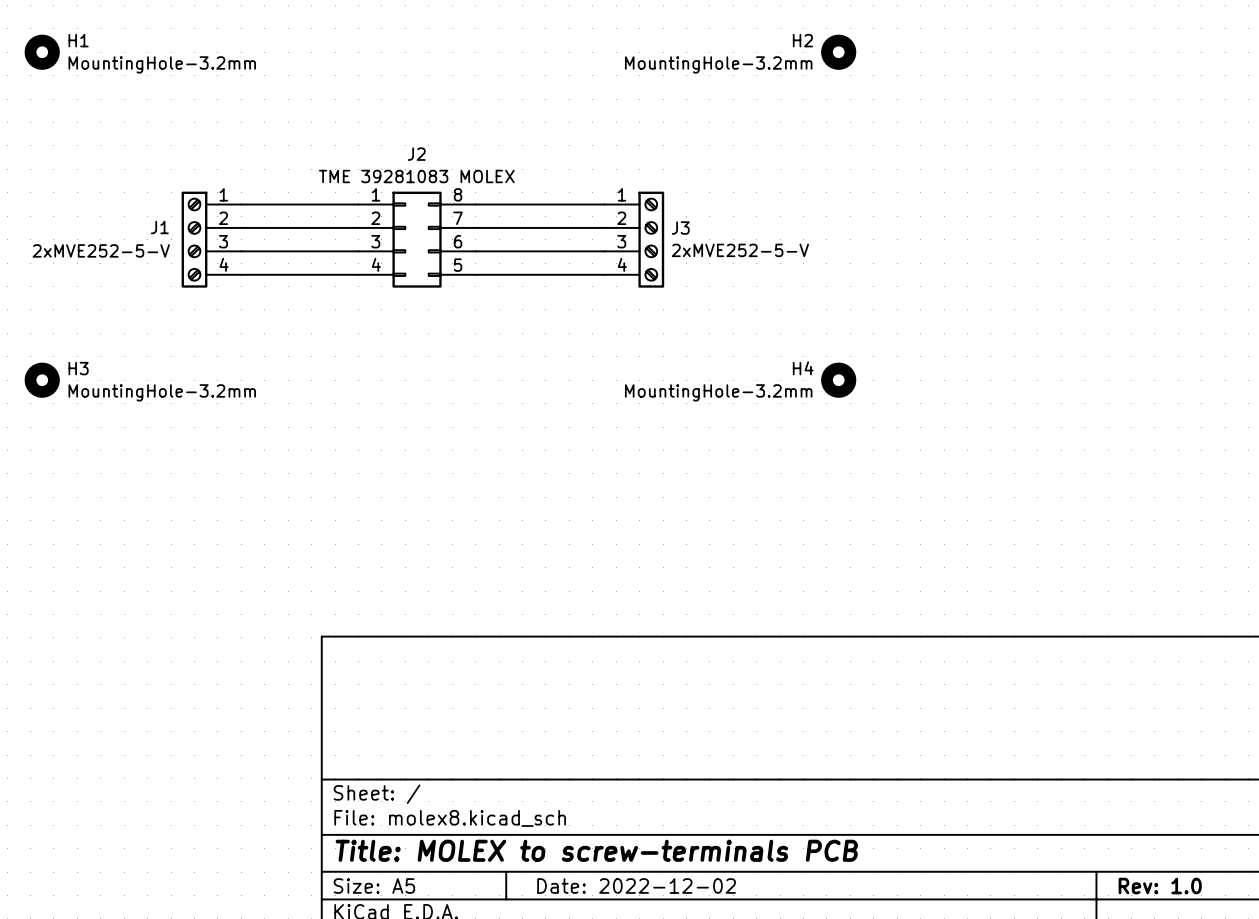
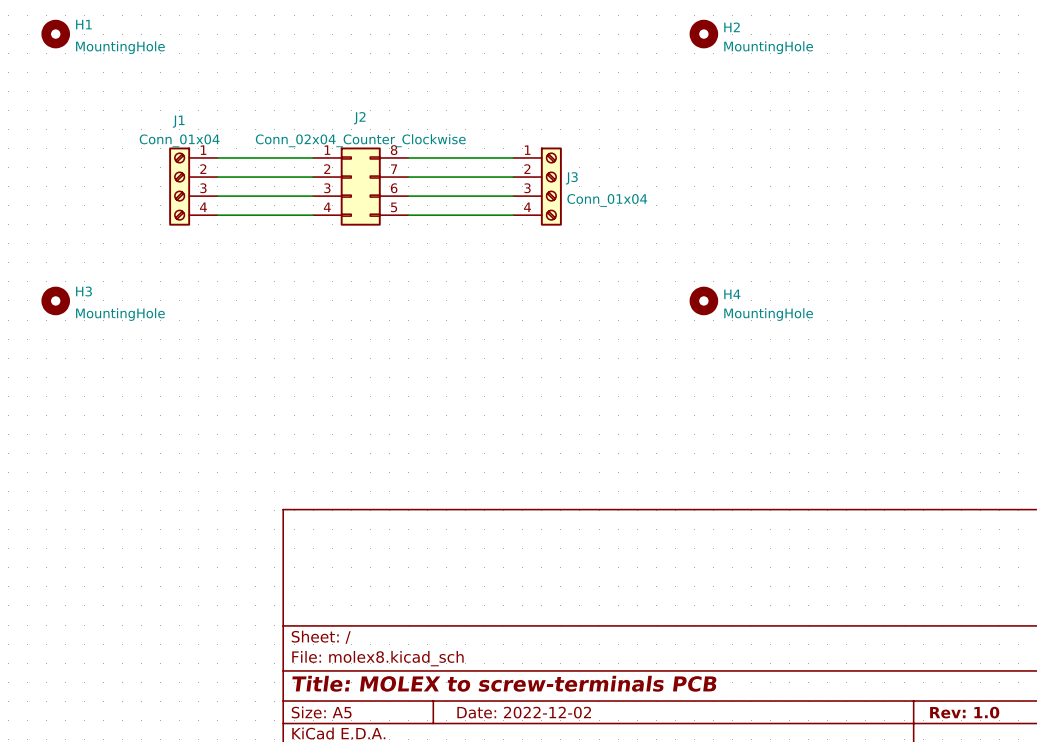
H2 name position: H2 (802, 40) -> H2 (732, 27)
H1 value: MountingHole-3.2mm (162, 64) -> MountingHole (120, 47)
H2 value: MountingHole-3.2mm (718, 64) -> MountingHole (768, 47)
J2 value: TME 39281083 MOLEX (416, 176) -> Conn_02x04_Counter_Clockwise (360, 140)
J1 name position: J1 (159, 227) -> J1 (178, 121)
J1 value: 2xMVE252-5-V (101, 250) -> Conn_01x04 (179, 140)
J3 value: 2xMVE252-5-V (740, 250) -> Conn_01x04 (607, 200)
H4 name position: H4 (803, 368) -> H4 (732, 294)
H3 value: MountingHole-3.2mm (162, 392) -> MountingHole (120, 314)
H4 value: MountingHole-3.2mm (718, 392) -> MountingHole (768, 314)

